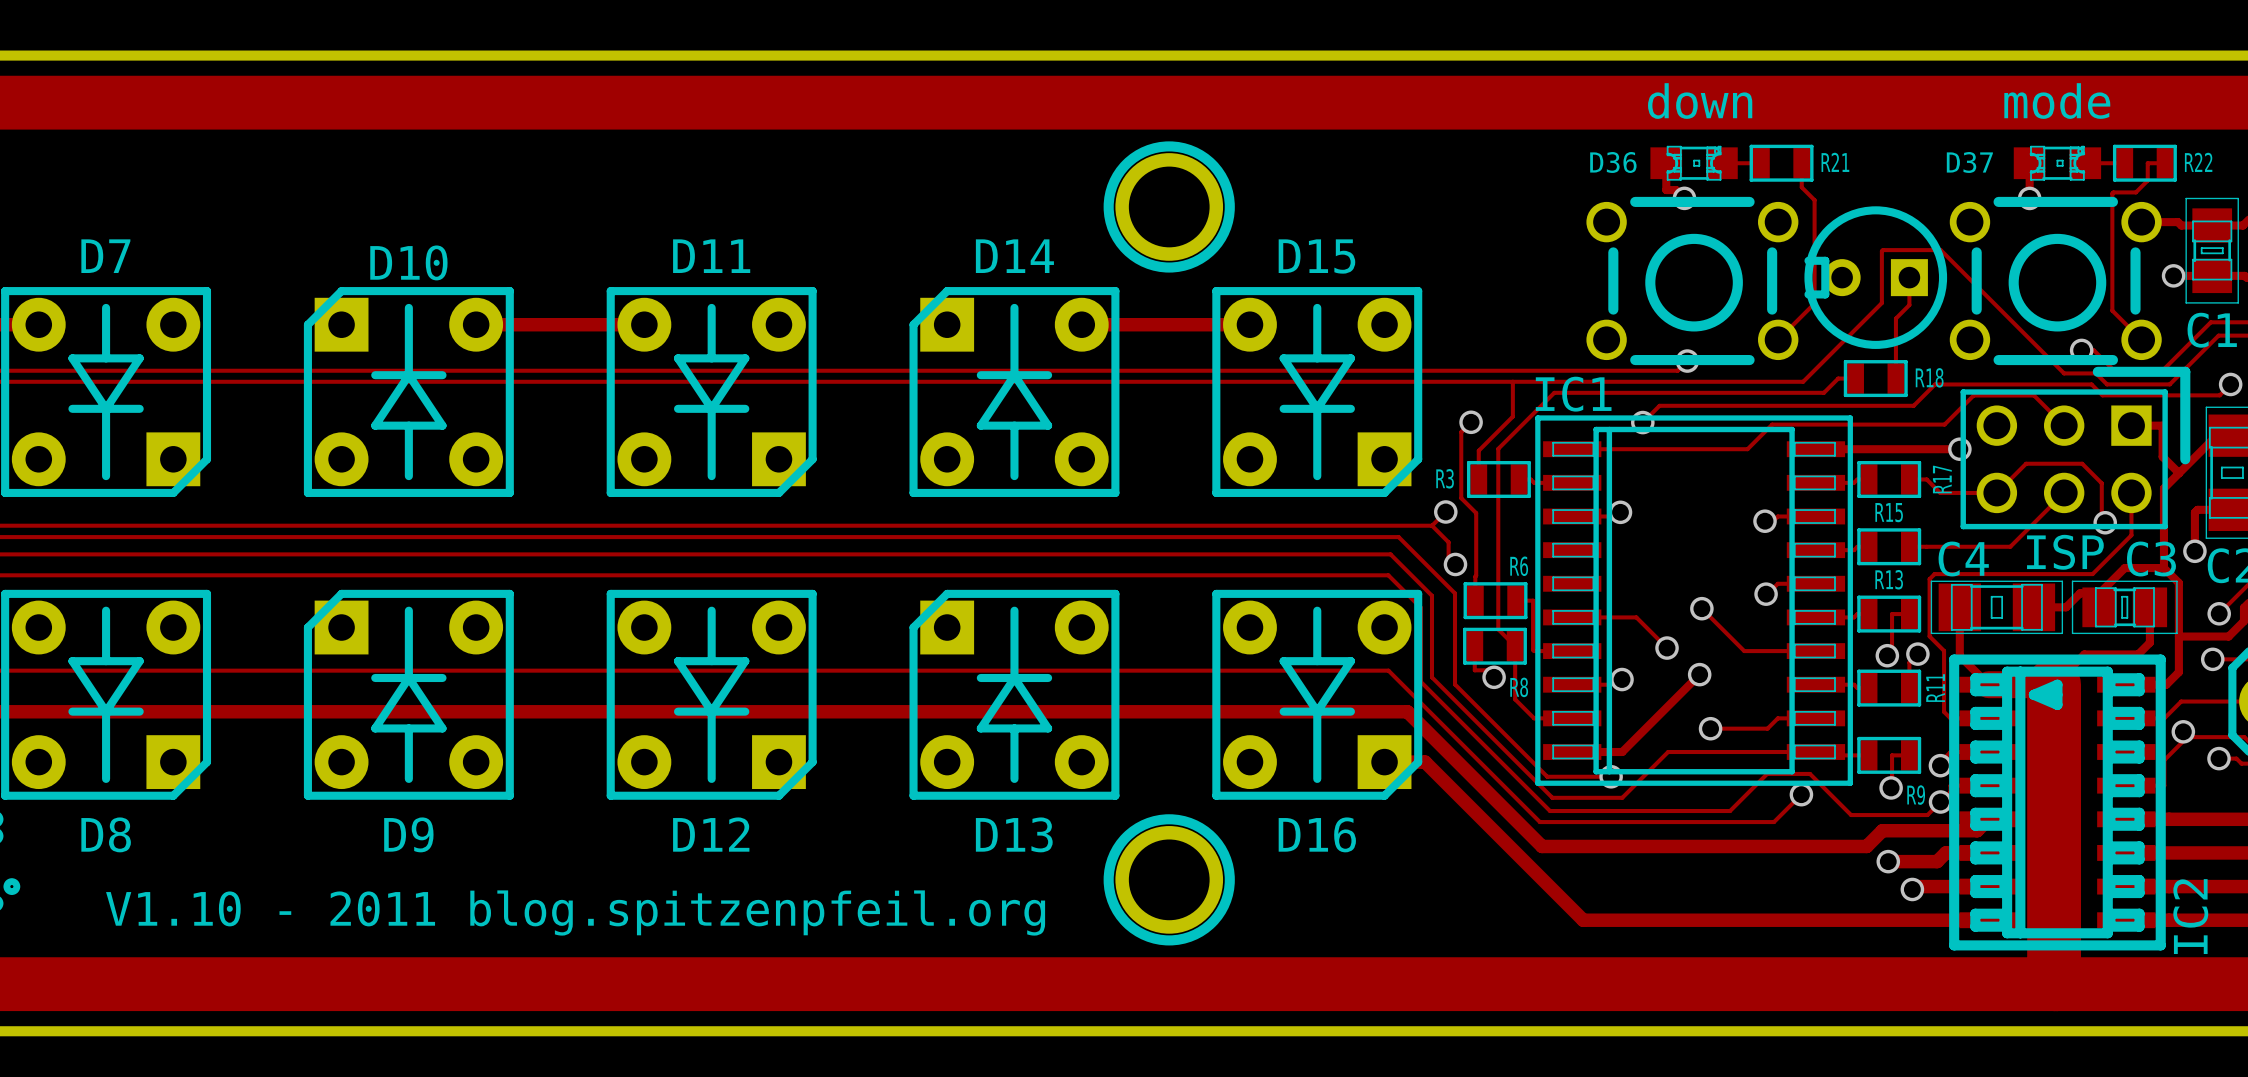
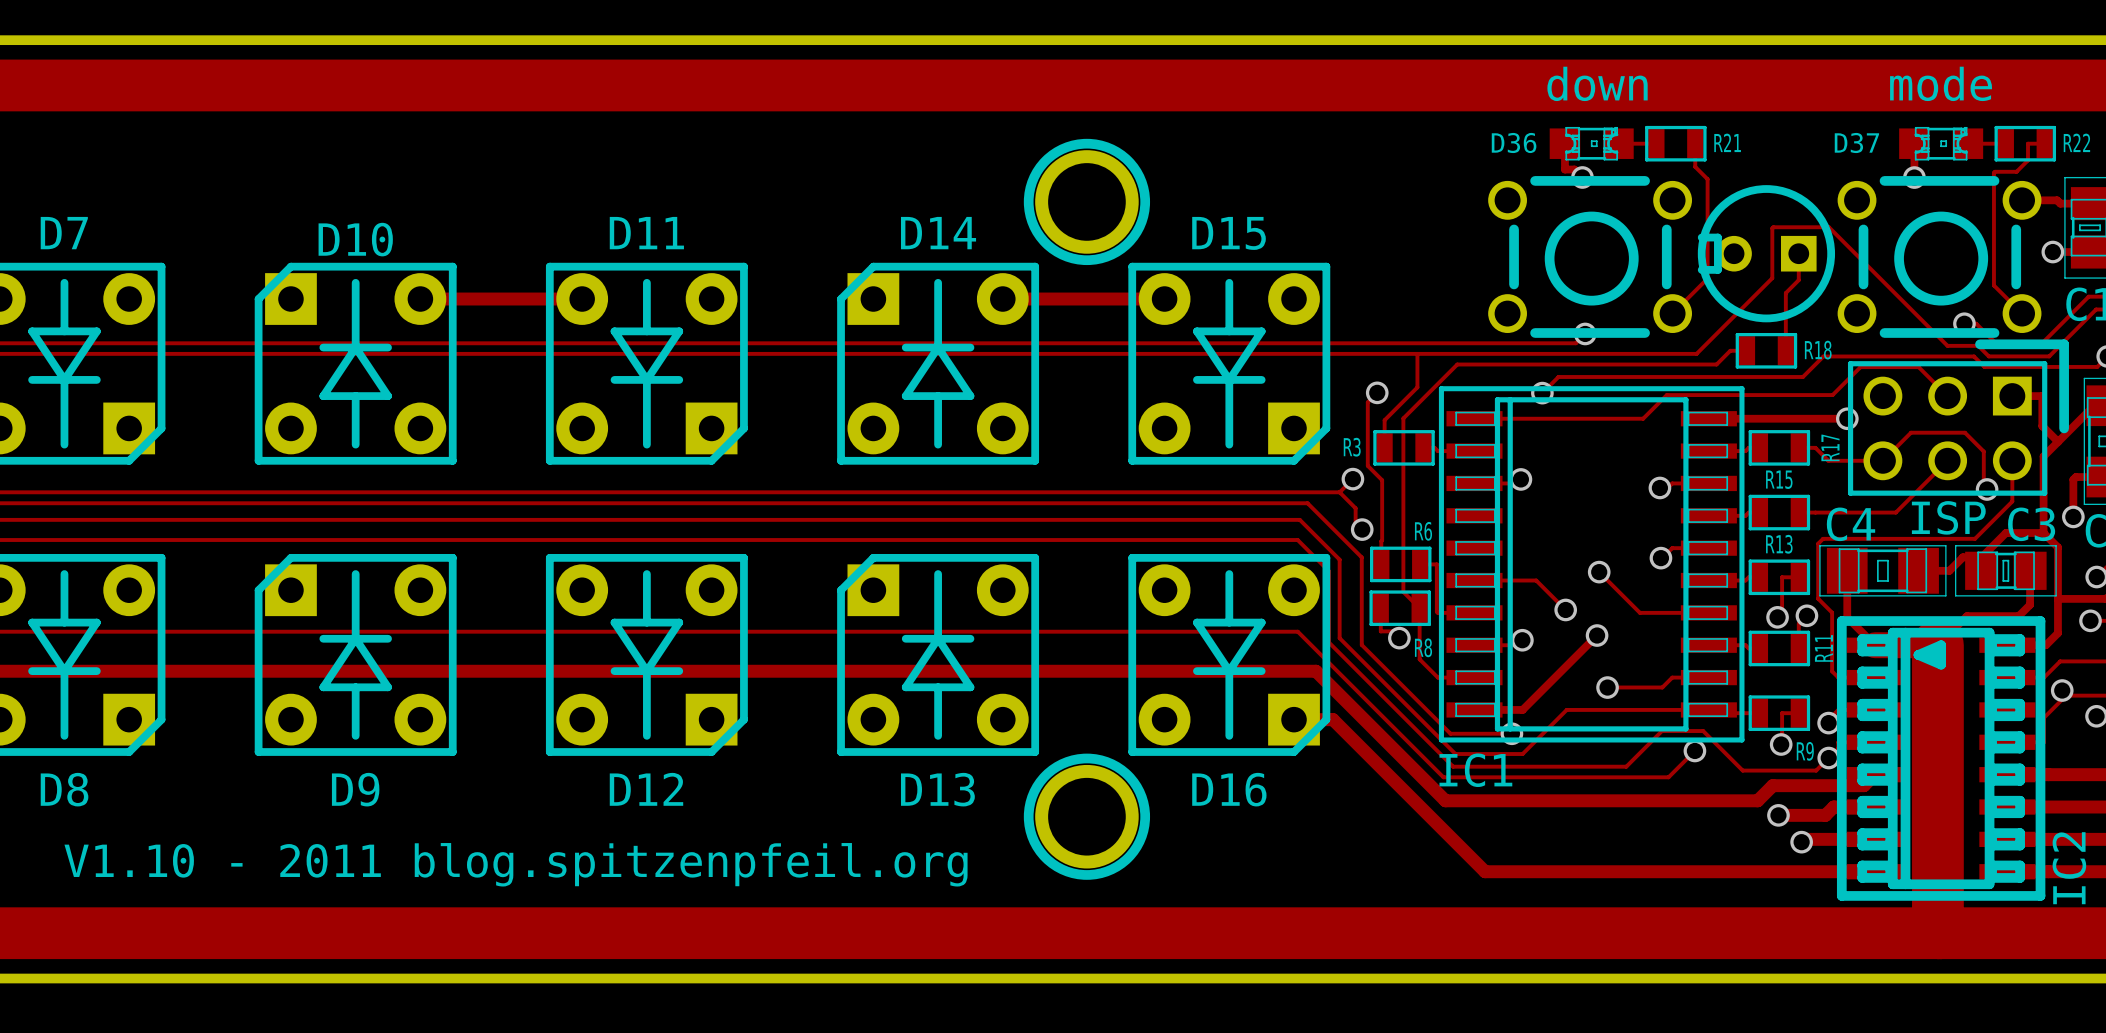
part position: (1169, 206) -> (1086, 201)
IC1 name position: IC1 (1573, 394) -> IC1 (1475, 770)
part position: (1169, 879) -> (1086, 816)

